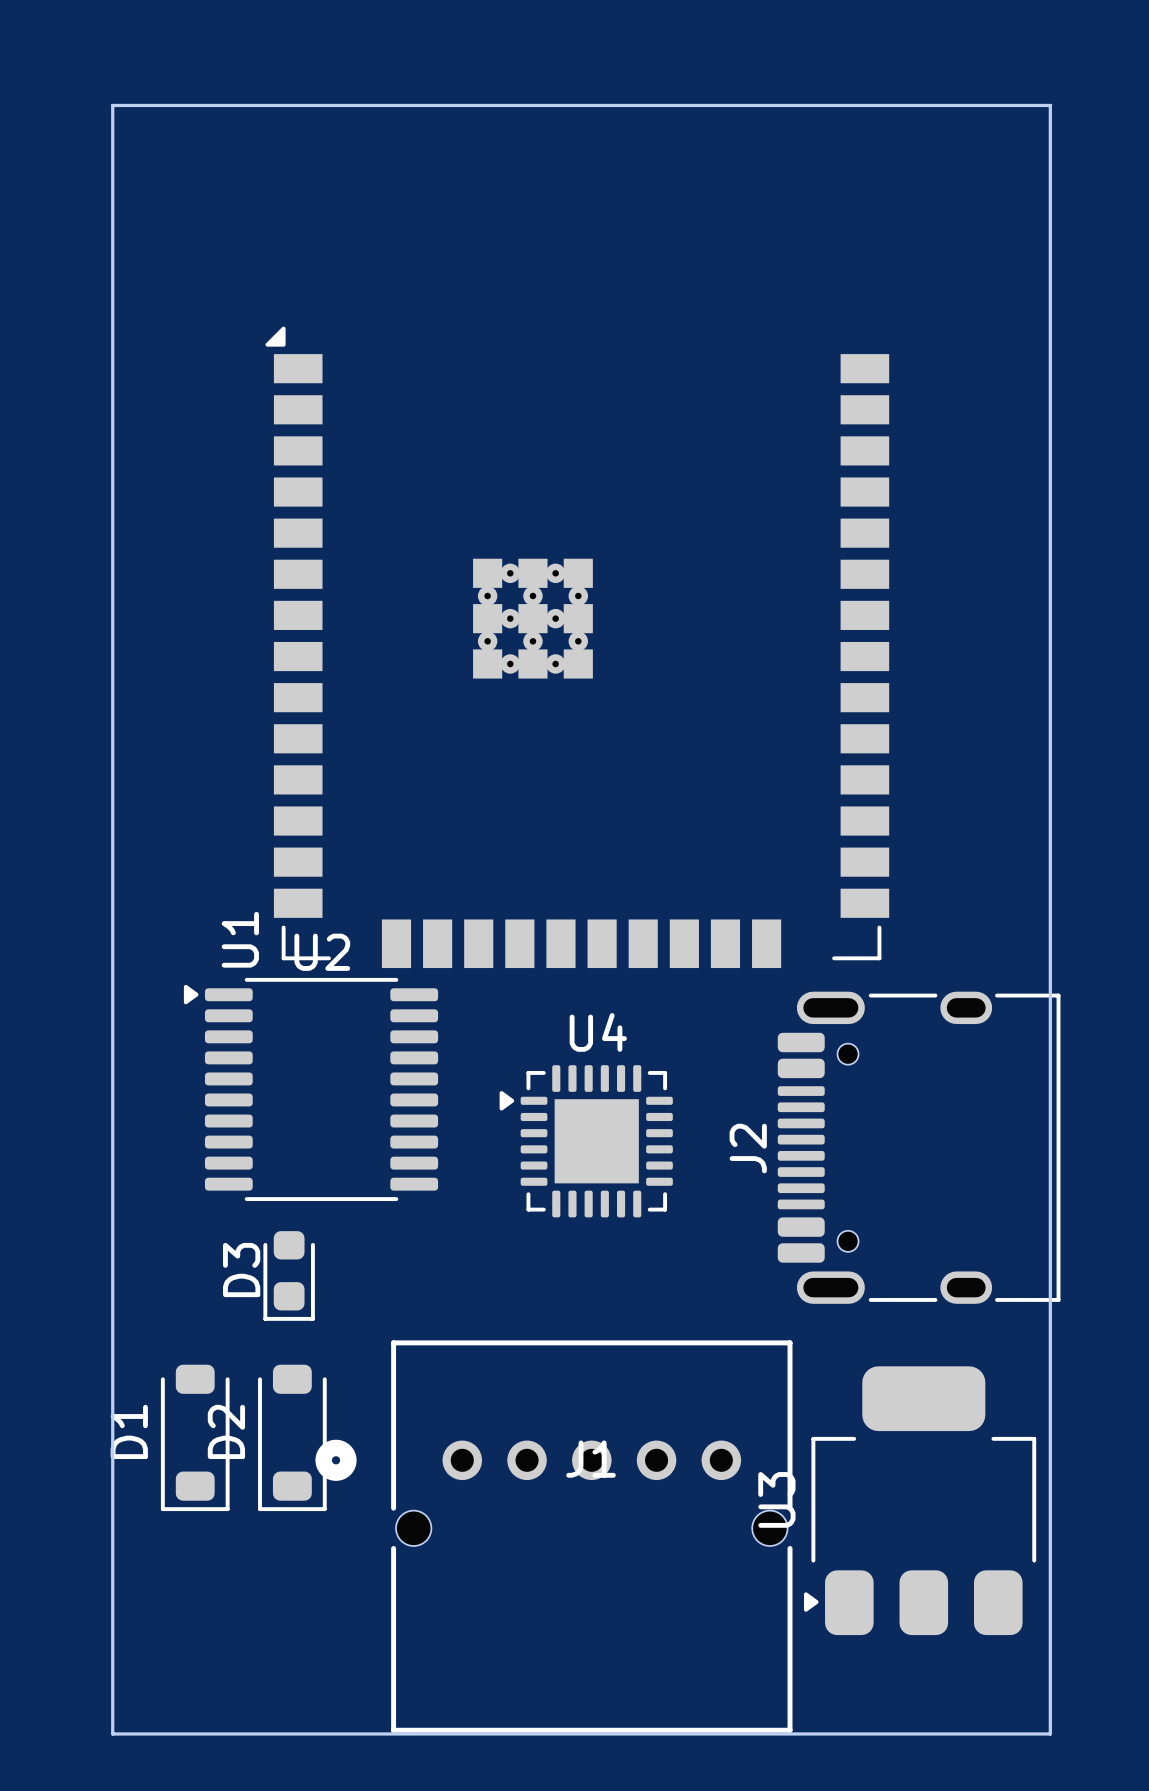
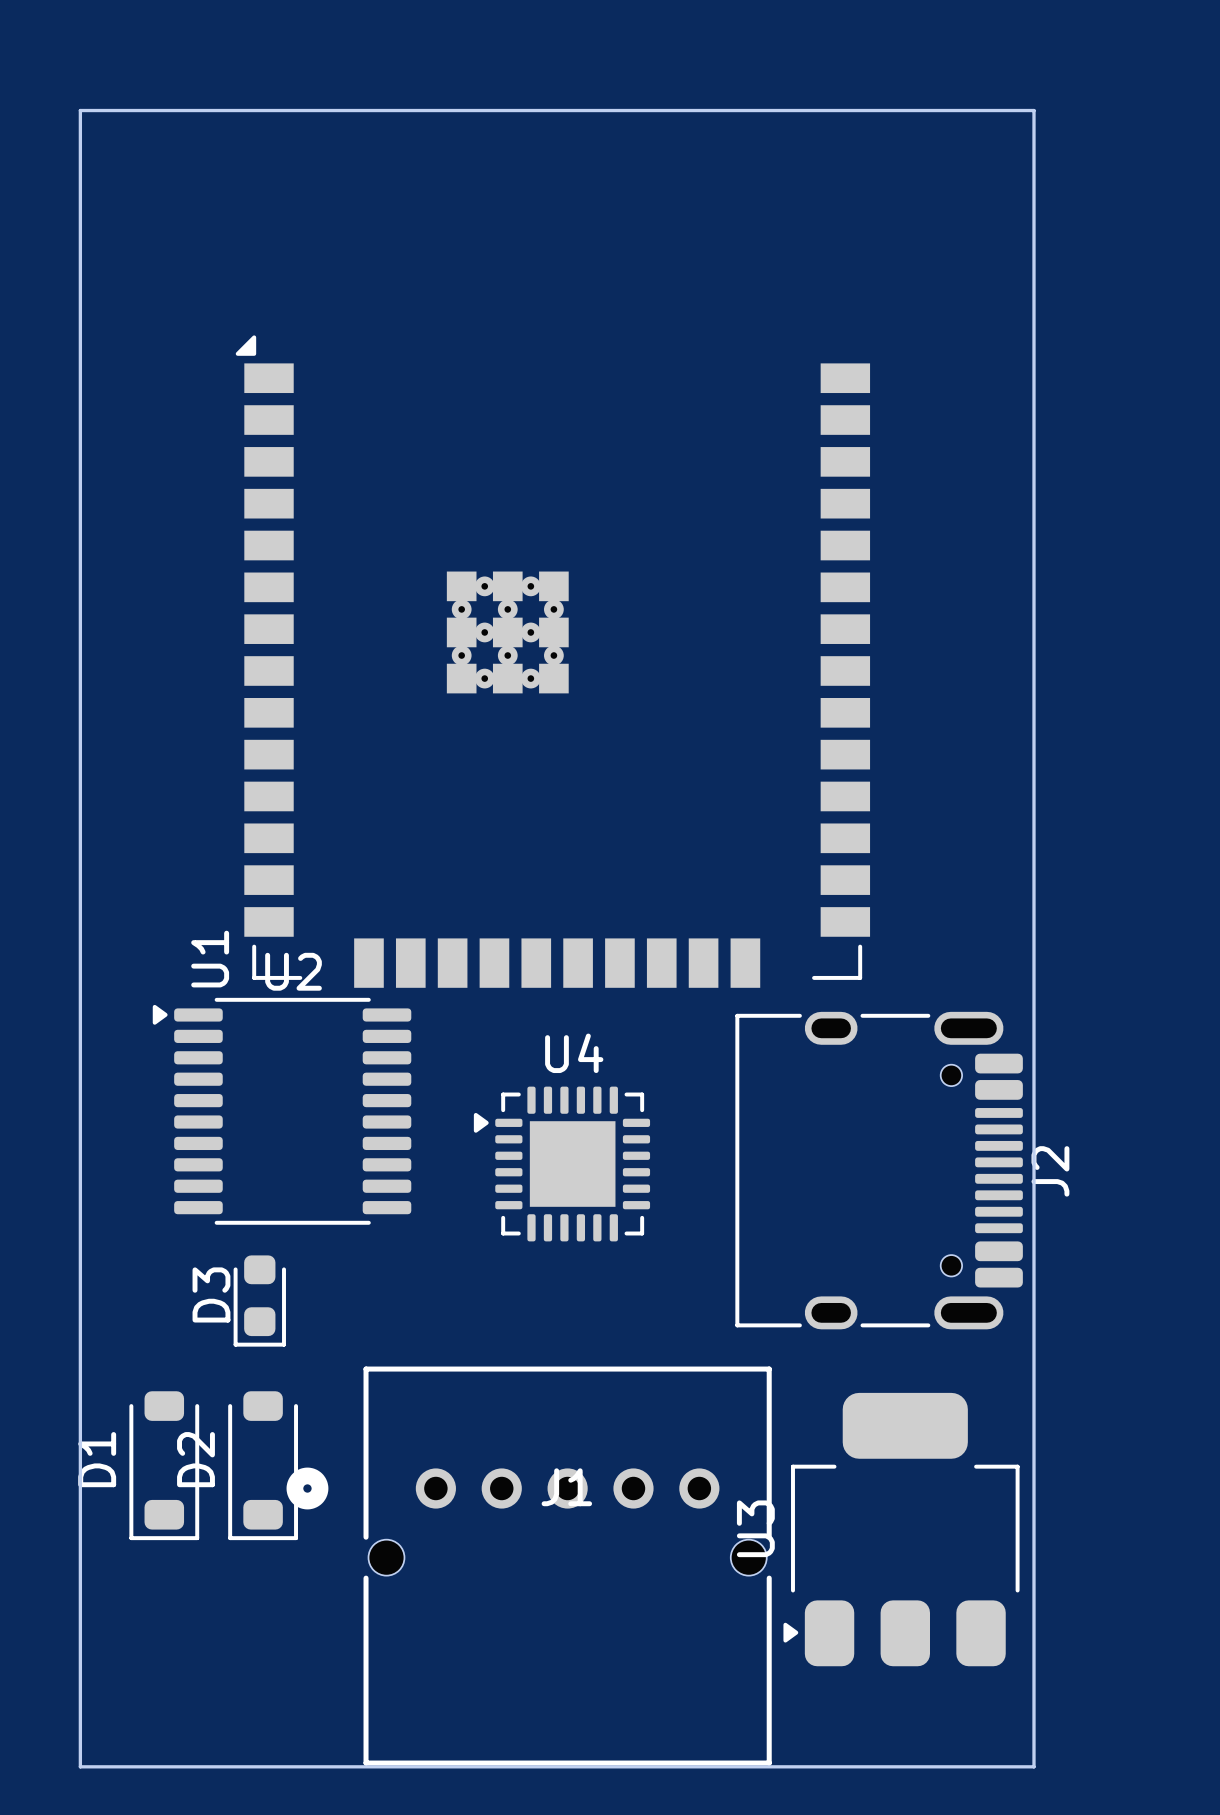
J2 rotation: 0° (919, 1147) -> 180° (879, 1170)

